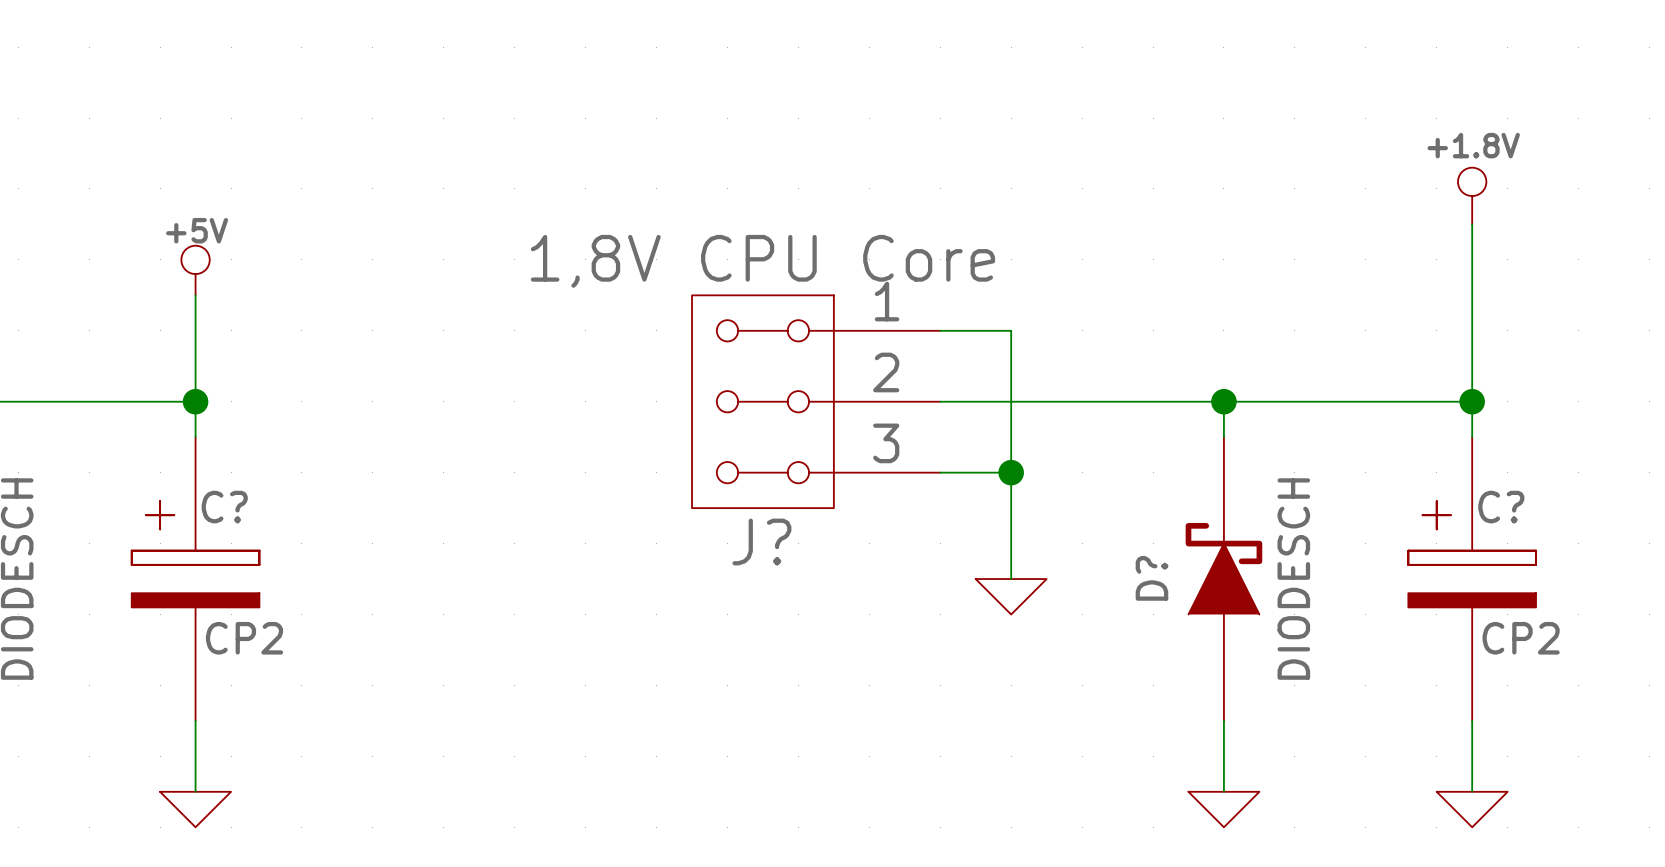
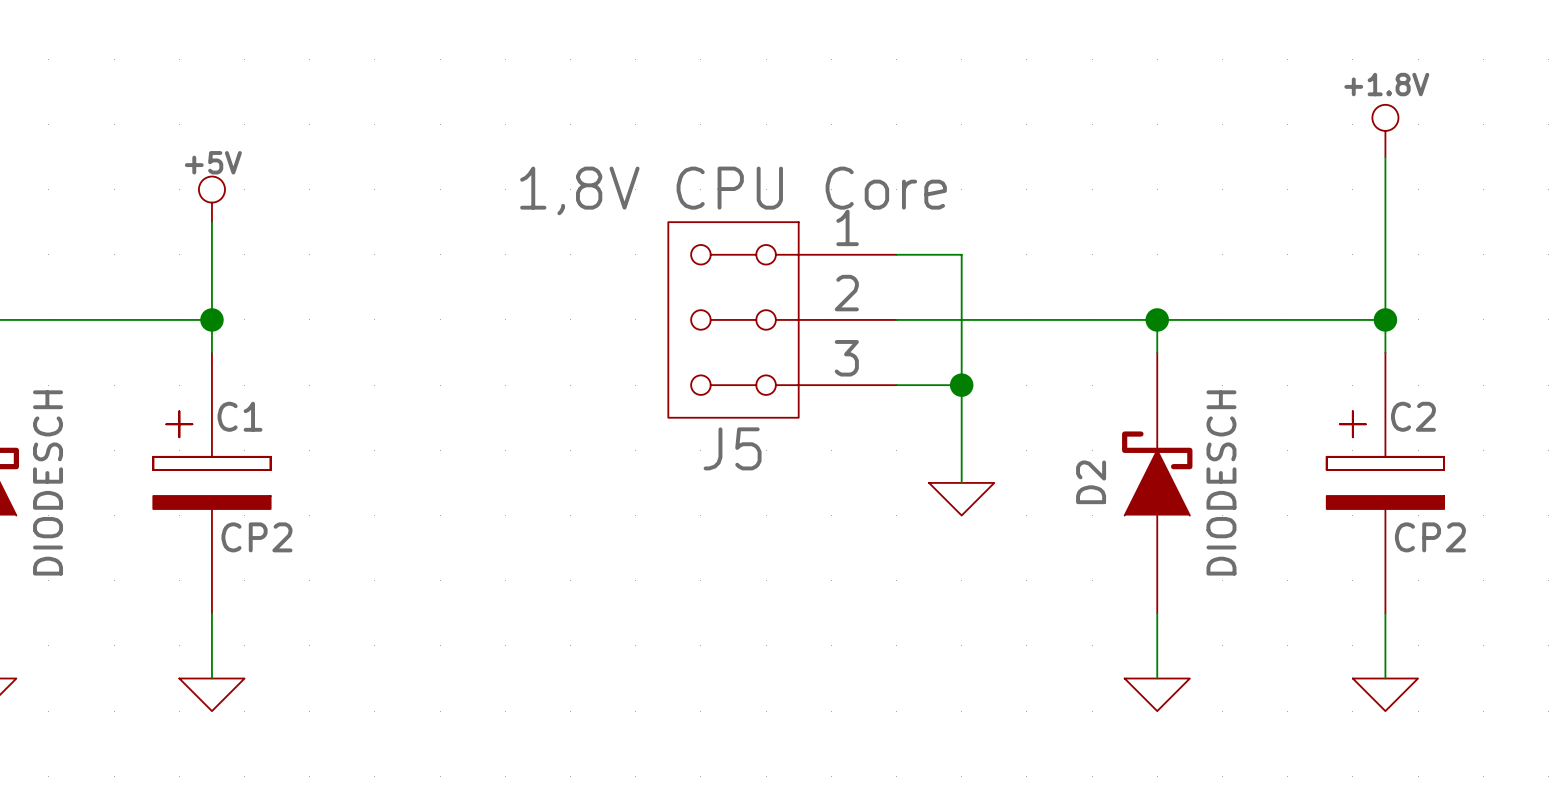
C? name: C? (224, 507) -> C1 (240, 416)
C? name: C? (1501, 507) -> C2 (1413, 416)
J? name: J? (761, 541) -> J5 (732, 448)
D? name: D? (1151, 578) -> D2 (1091, 482)

